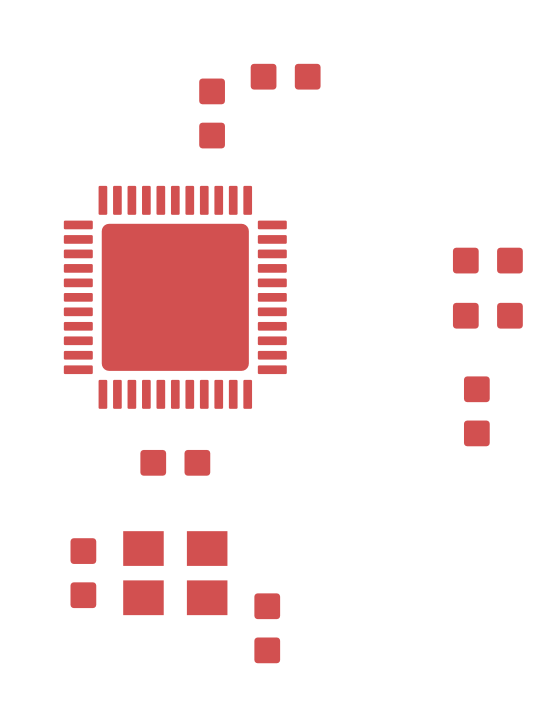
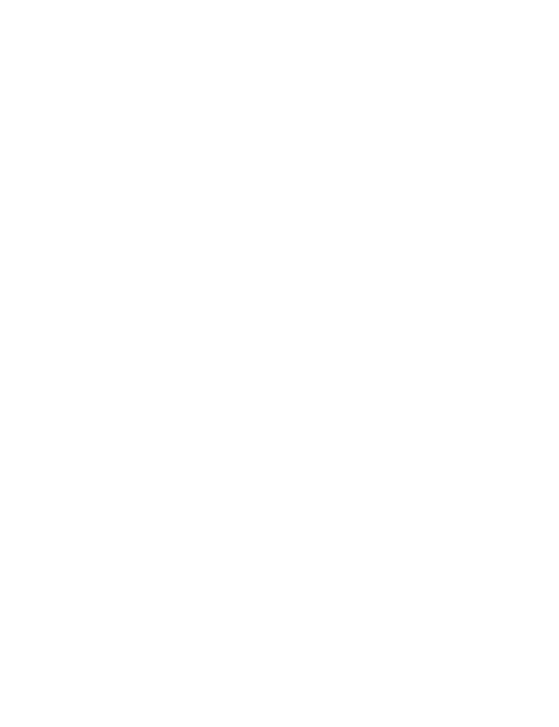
part: (285, 76) -> none
part: (212, 113) -> none
part: (487, 260) -> none
part: (175, 297) -> none
part: (487, 315) -> none
part: (476, 411) -> none
part: (175, 462) -> none
part: (83, 573) -> none
part: (175, 573) -> none
part: (267, 628) -> none

